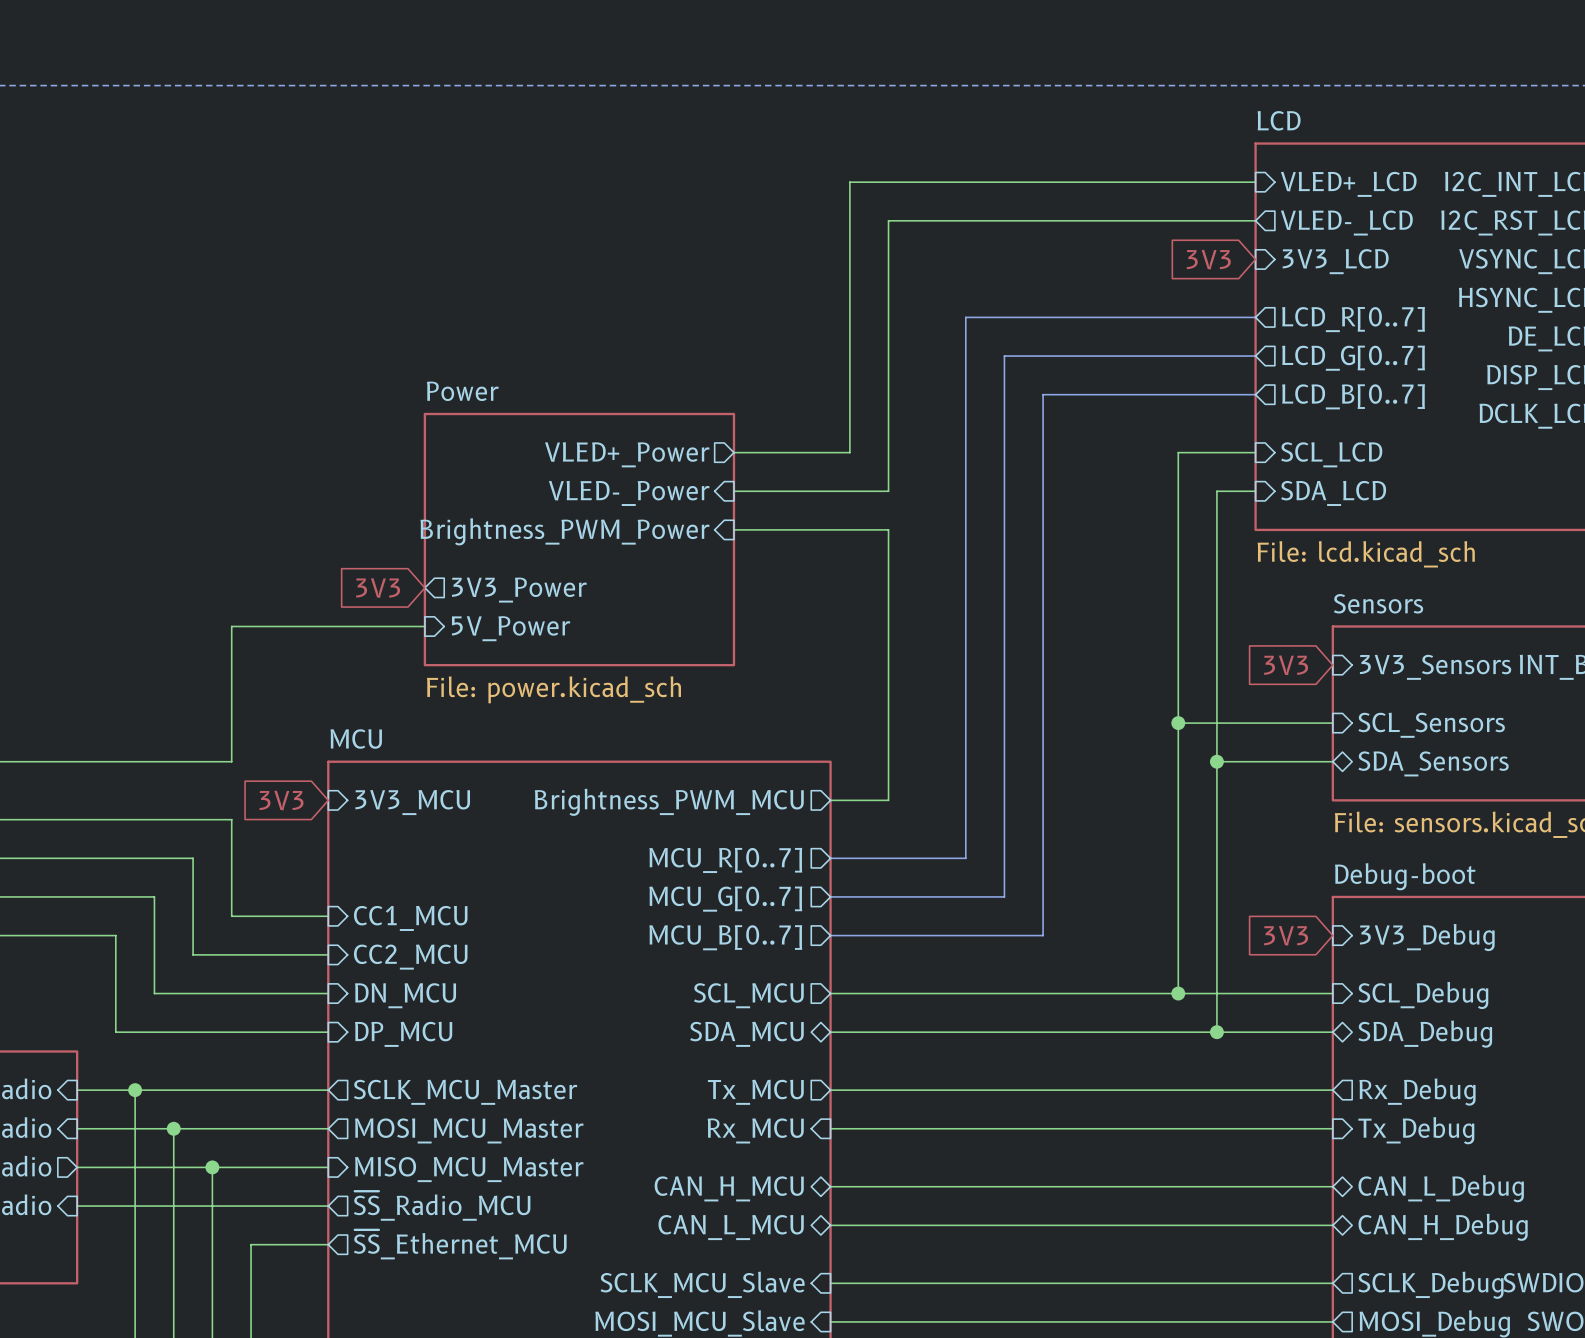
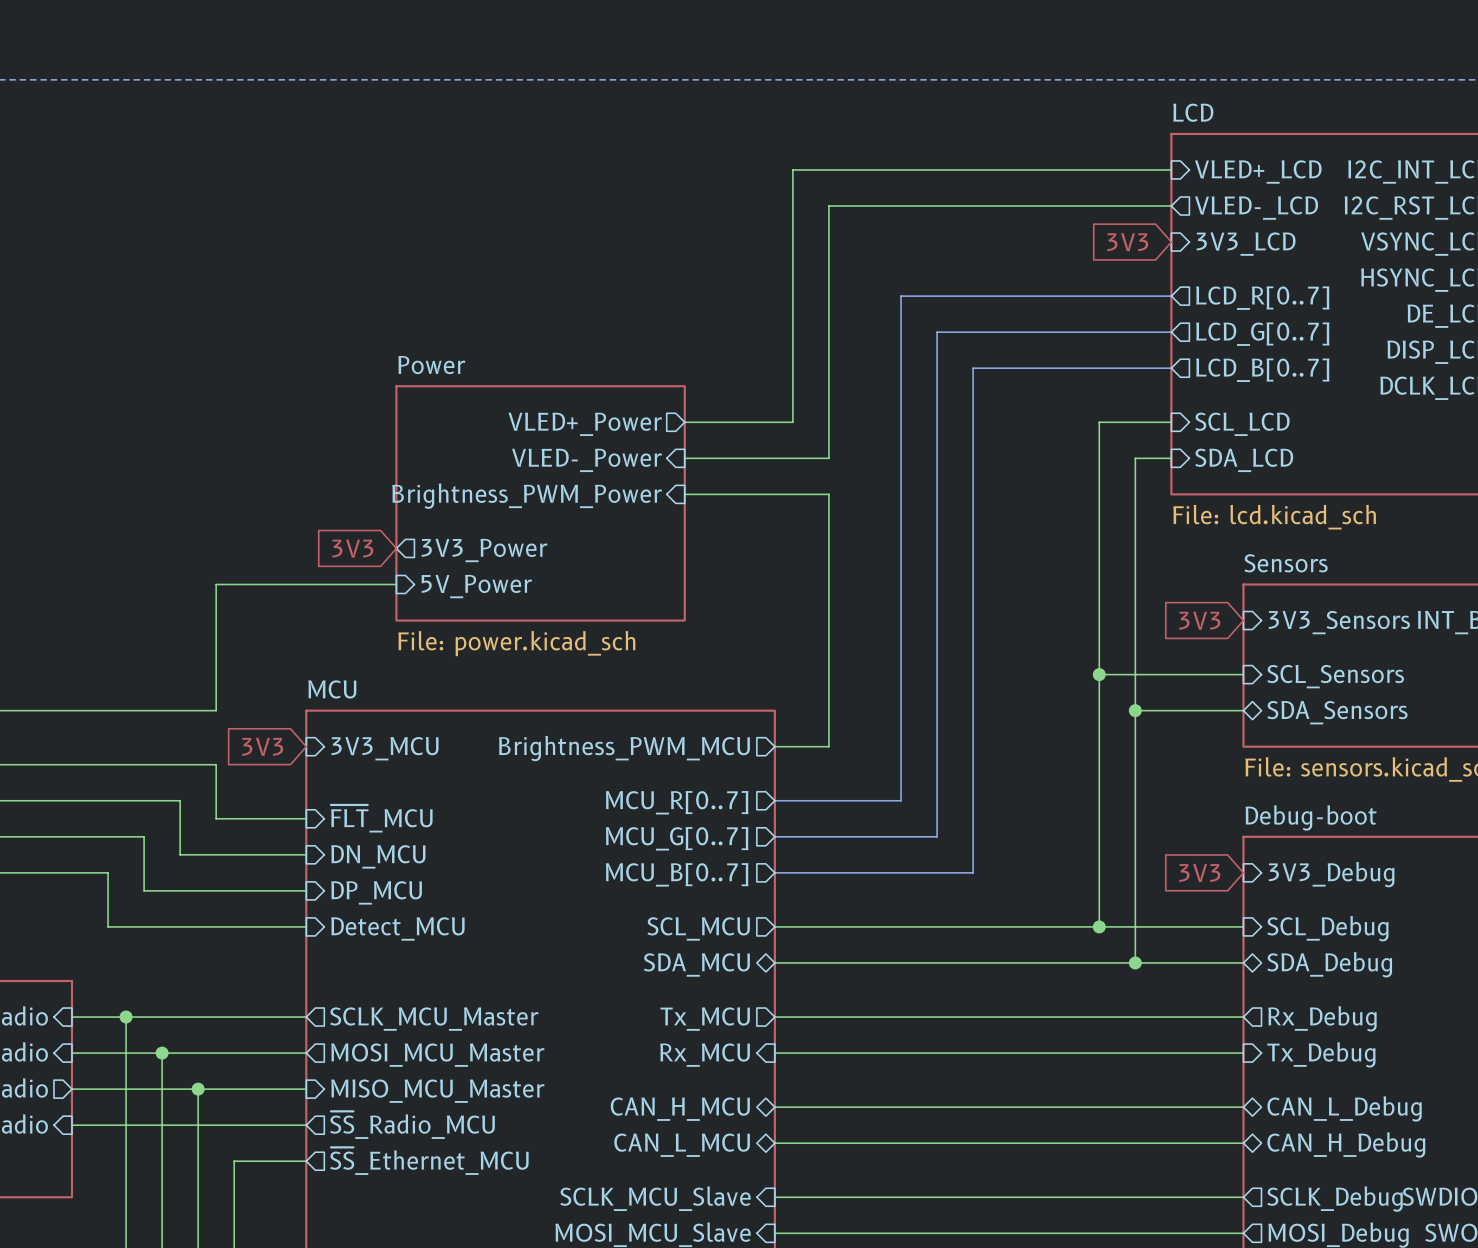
wire: (231, 877) (231, 916) -> (216, 818) (306, 818)
sheet pin: none -> ~{FLT}_MCU (381, 818)
wire: (193, 916) (193, 954) -> (180, 854) (216, 854)
sheet pin: CC1_MCU (410, 918) -> DN_MCU (378, 856)
wire: (154, 954) (154, 993) -> (108, 926) (144, 926)
wire: none -> (144, 890) (180, 890)
sheet pin: CC2_MCU (410, 957) -> DP_MCU (376, 892)
wire: (115, 993) (115, 1032) (328, 1032) -> none
sheet pin: DN_MCU (405, 995) -> Detect_MCU (397, 928)
sheet pin: DP_MCU (403, 1034) -> none

